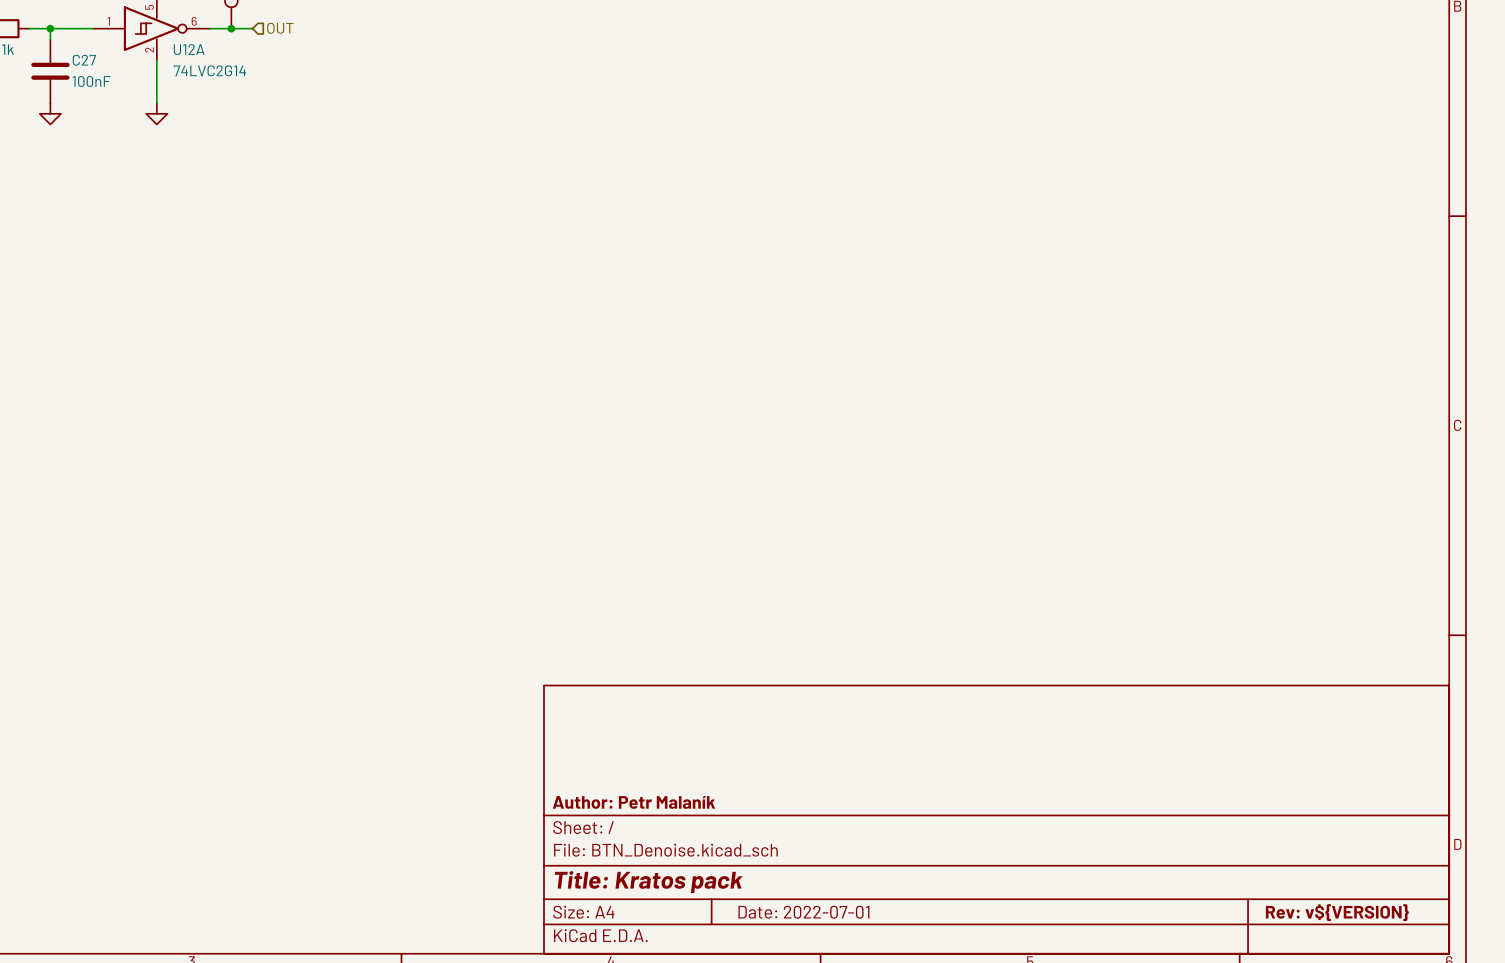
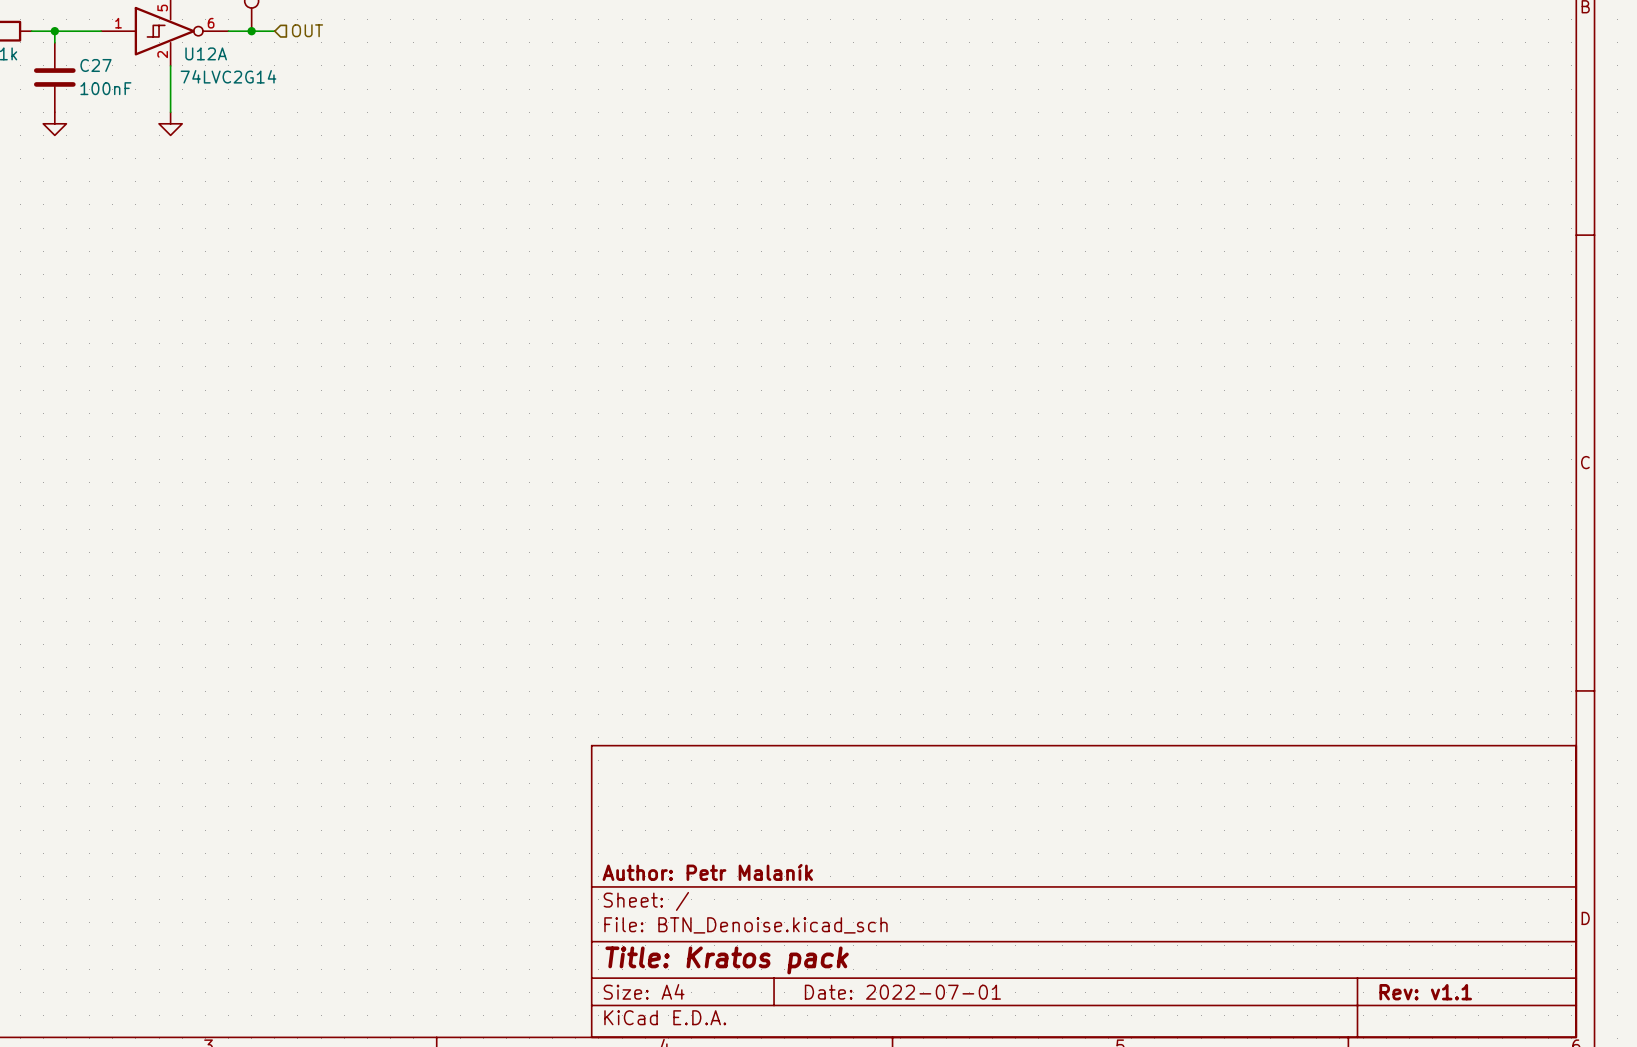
title block: Rev: v${VERSION} (1337, 912) -> Rev: v1.1 (1425, 992)

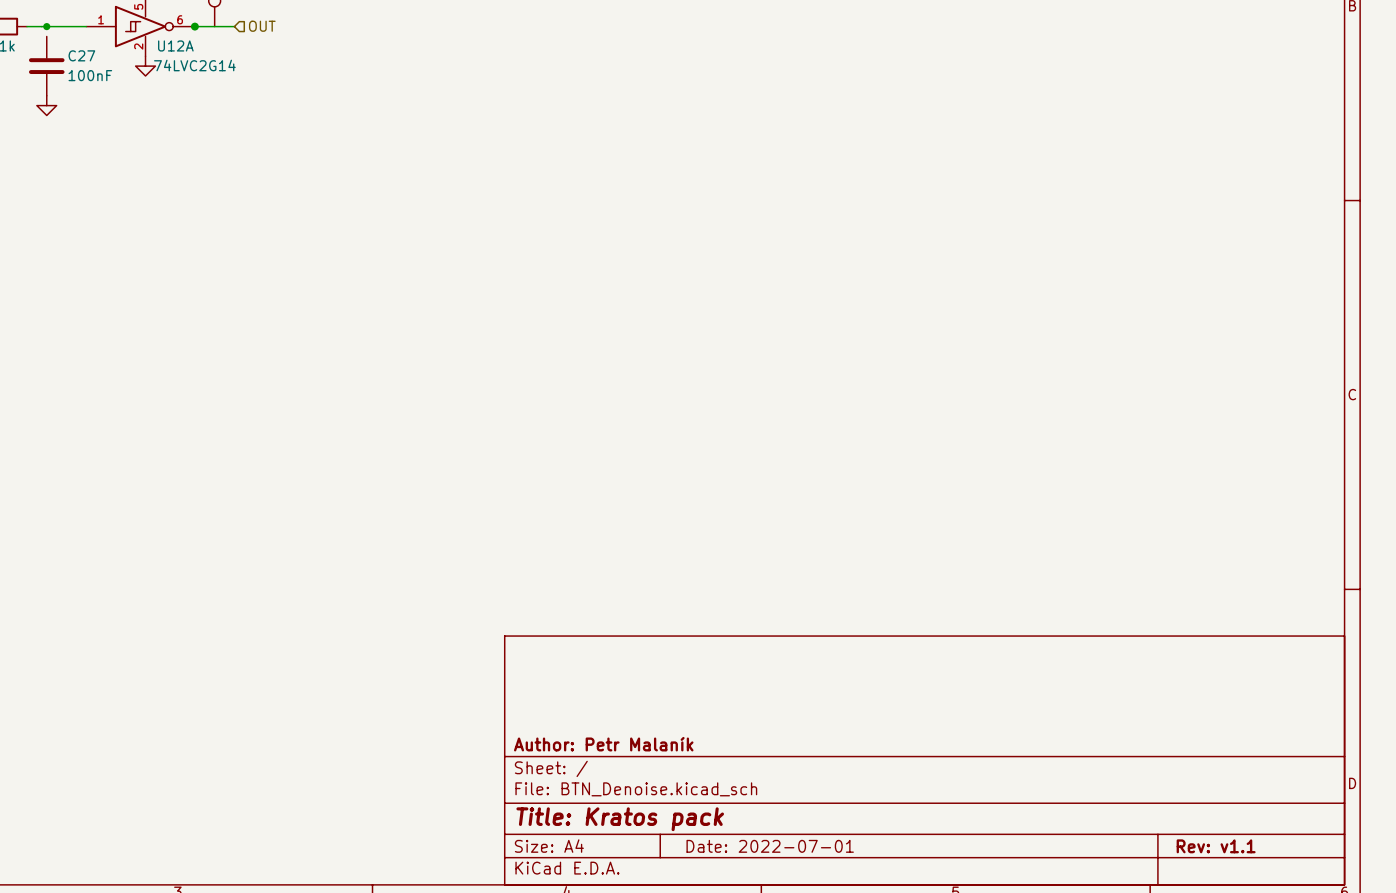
wire: (54, 31) (54, 42) -> none
junction: none -> (194, 26)
junction: (251, 31) -> none
wire: (170, 65) (170, 112) -> none
power symbol position: (170, 123) -> (145, 66)

